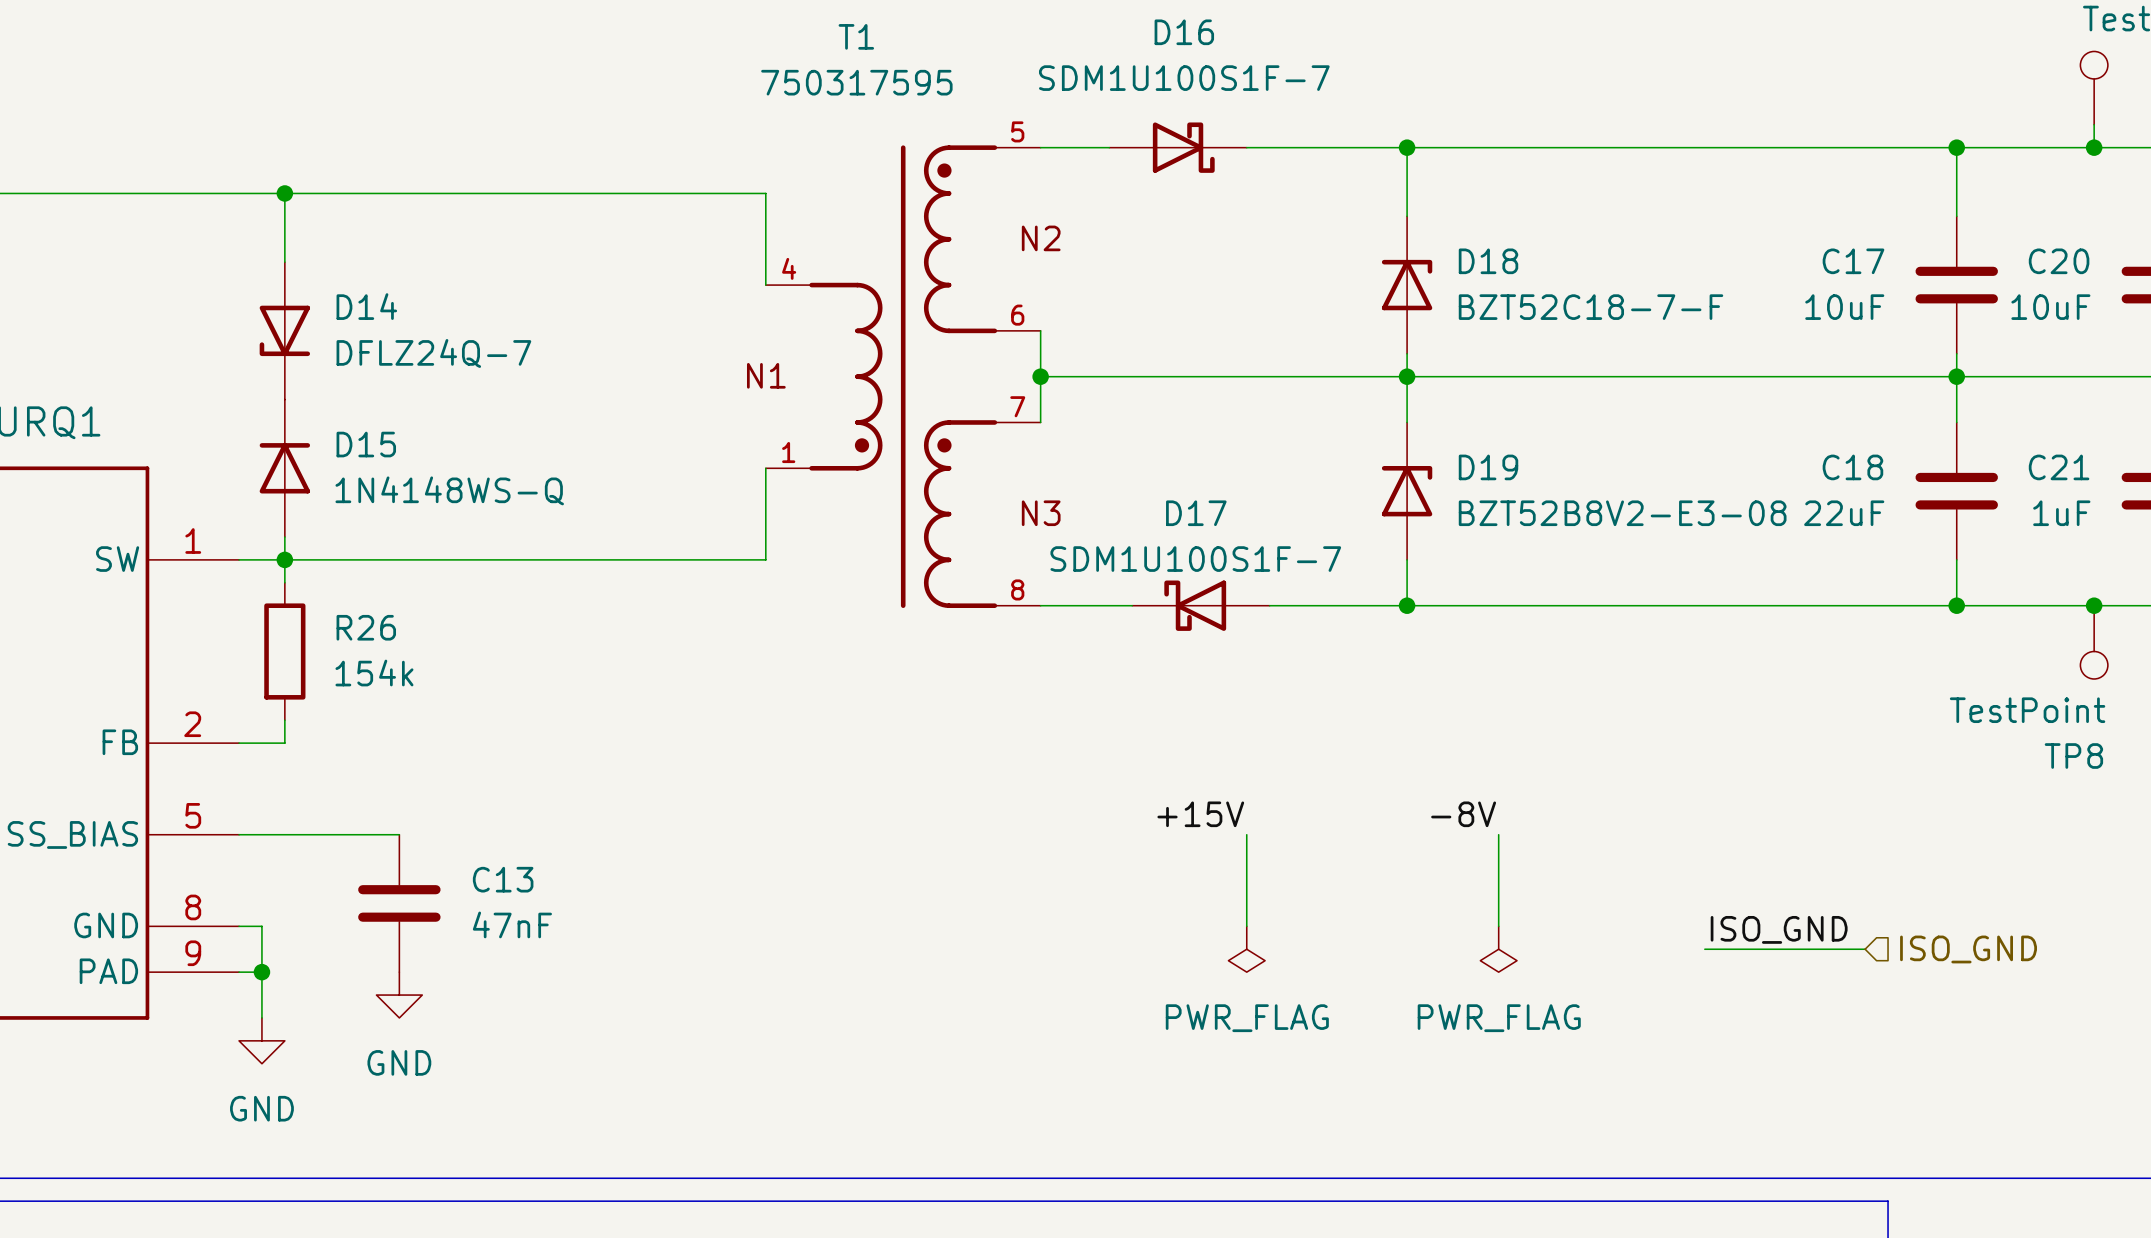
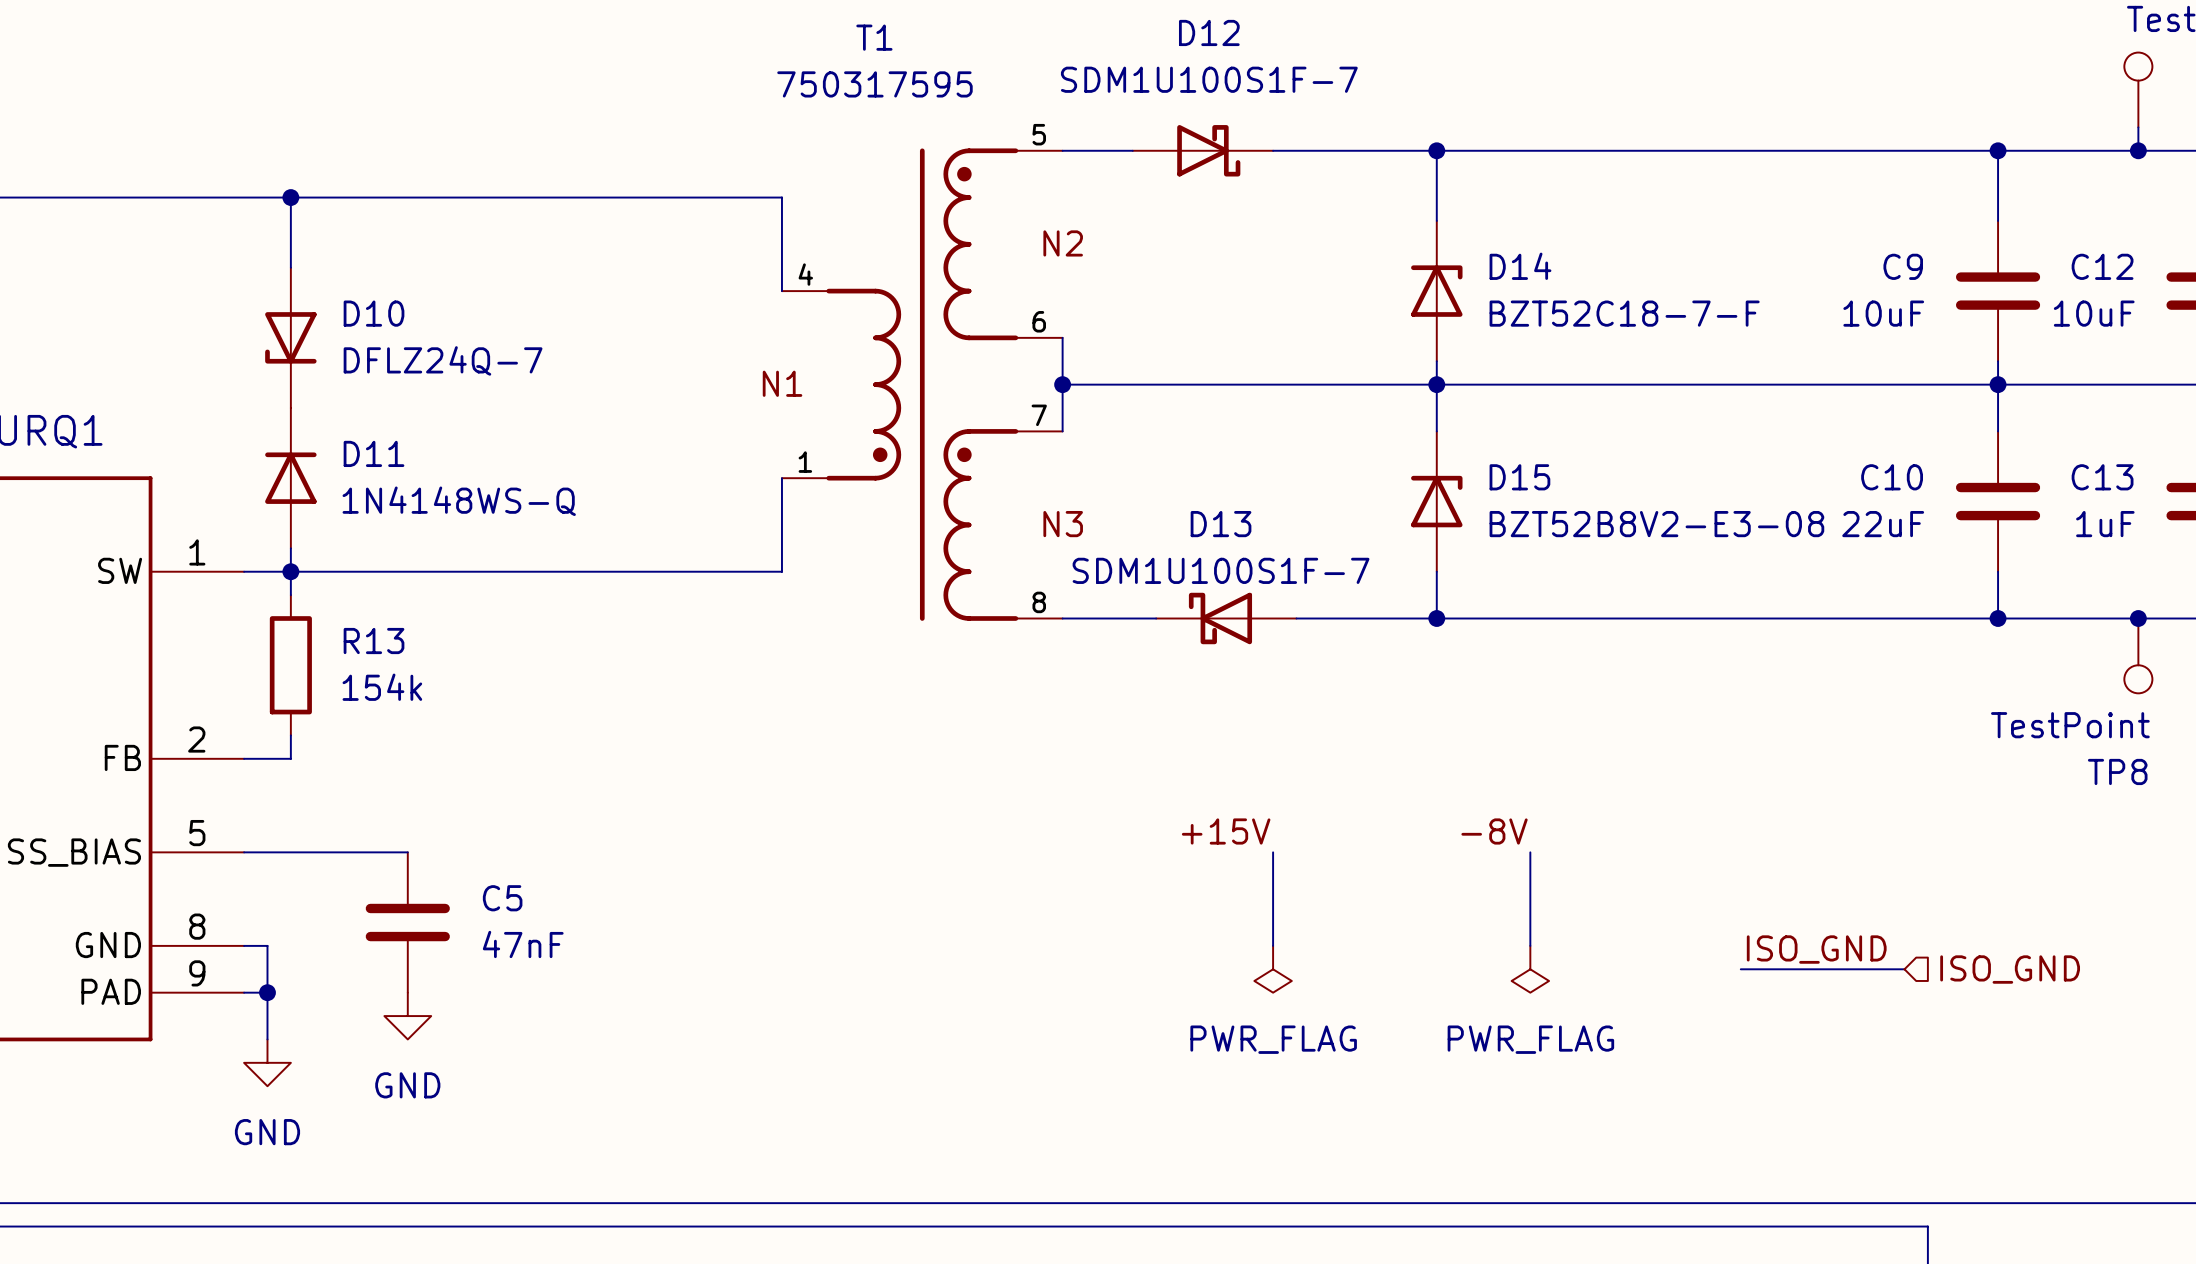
D16 name: D16 (1184, 32) -> D12 (1209, 32)
D18 name: D18 (1488, 261) -> D14 (1520, 266)
C17 name: C17 (1853, 261) -> C9 (1903, 266)
C20 name: C20 (2059, 261) -> C12 (2102, 266)
D14 name: D14 (366, 306) -> D10 (374, 313)
D15 name: D15 (366, 444) -> D11 (374, 453)
D19 name: D19 (1488, 467) -> D15 (1519, 477)
C18 name: C18 (1852, 467) -> C10 (1892, 477)
C21 name: C21 (2059, 467) -> C13 (2102, 477)
D17 name: D17 (1196, 513) -> D13 (1221, 524)
R26 name: R26 (366, 627) -> R13 (374, 641)
C13 name: C13 (503, 879) -> C5 (502, 898)

